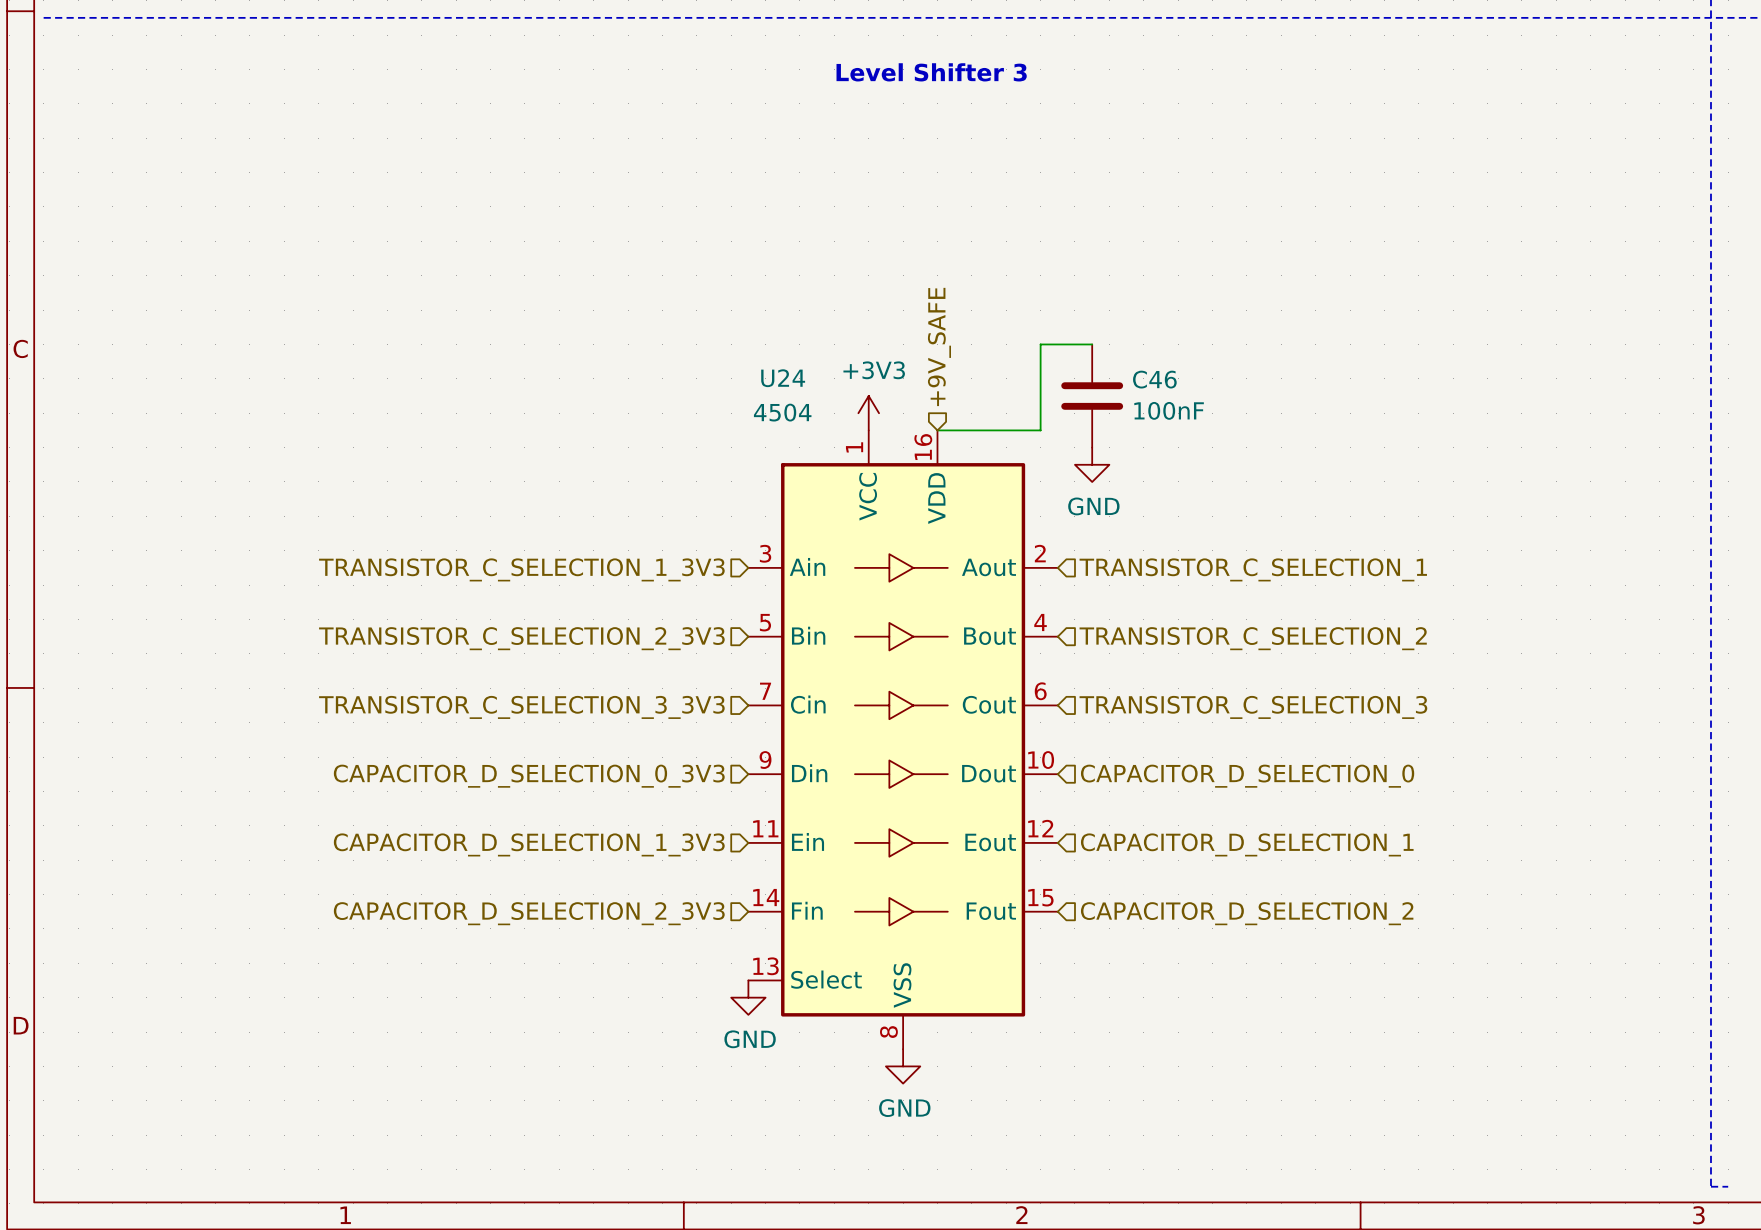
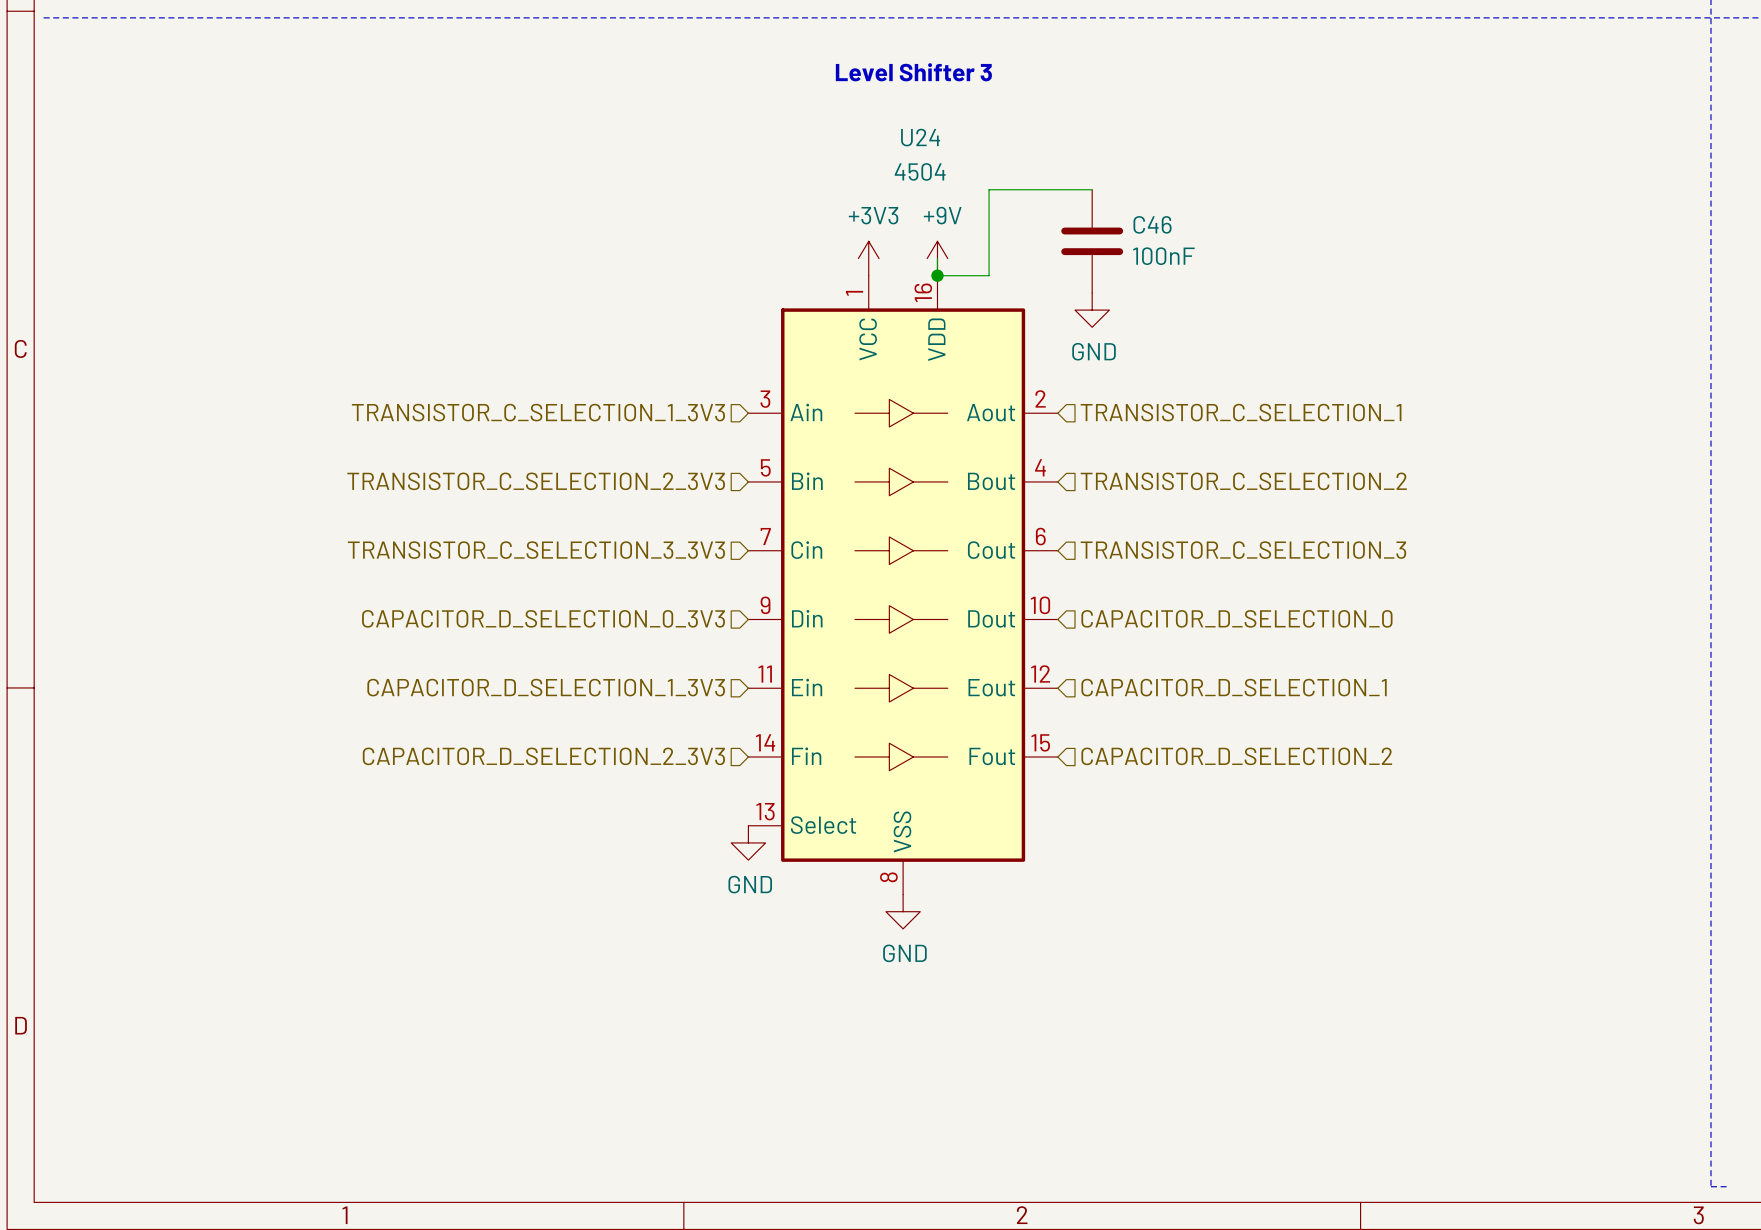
wire: none -> (1092, 189) (989, 189) (989, 275) (937, 275) (937, 258)
power symbol: none -> +9V (937, 258)
junction: none -> (937, 275)
wire: (1092, 344) (1040, 344) (1040, 430) (937, 430) -> none
hierarchical label: +9V_SAFE (939, 346) -> none
U24 name position: U24 (783, 378) -> U24 (920, 137)
C46 position: (1092, 396) -> (1092, 241)
U24 value position: 4504 (782, 412) -> 4504 (920, 171)
power symbol position: +3V3 (868, 413) -> +3V3 (868, 258)
power symbol position: GND (1092, 464) -> GND (1092, 310)
hierarchical label position: TRANSISTOR_C_SELECTION_1_3V3 (521, 569) -> TRANSISTOR_C_SELECTION_1_3V3 (538, 412)
hierarchical label position: TRANSISTOR_C_SELECTION_1 (1253, 569) -> TRANSISTOR_C_SELECTION_1 (1241, 412)
hierarchical label position: TRANSISTOR_C_SELECTION_2_3V3 (521, 638) -> TRANSISTOR_C_SELECTION_2_3V3 (536, 481)
hierarchical label position: TRANSISTOR_C_SELECTION_2 (1253, 638) -> TRANSISTOR_C_SELECTION_2 (1243, 481)
hierarchical label position: TRANSISTOR_C_SELECTION_3_3V3 (521, 707) -> TRANSISTOR_C_SELECTION_3_3V3 (536, 550)
hierarchical label position: TRANSISTOR_C_SELECTION_3 (1253, 707) -> TRANSISTOR_C_SELECTION_3 (1243, 550)
U24 position: (903, 739) -> (903, 585)
hierarchical label position: CAPACITOR_D_SELECTION_0_3V3 (529, 776) -> CAPACITOR_D_SELECTION_0_3V3 (543, 618)
hierarchical label position: CAPACITOR_D_SELECTION_0 (1247, 776) -> CAPACITOR_D_SELECTION_0 (1236, 618)
power symbol: none -> GND (748, 842)
hierarchical label position: CAPACITOR_D_SELECTION_1_3V3 (529, 844) -> CAPACITOR_D_SELECTION_1_3V3 (546, 687)
hierarchical label position: CAPACITOR_D_SELECTION_1 (1247, 844) -> CAPACITOR_D_SELECTION_1 (1234, 687)
power symbol: none -> GND (903, 911)
hierarchical label position: CAPACITOR_D_SELECTION_2_3V3 (529, 913) -> CAPACITOR_D_SELECTION_2_3V3 (543, 756)
hierarchical label position: CAPACITOR_D_SELECTION_2 (1247, 913) -> CAPACITOR_D_SELECTION_2 (1236, 756)
power symbol: GND (748, 997) -> none
power symbol: GND (903, 1066) -> none

